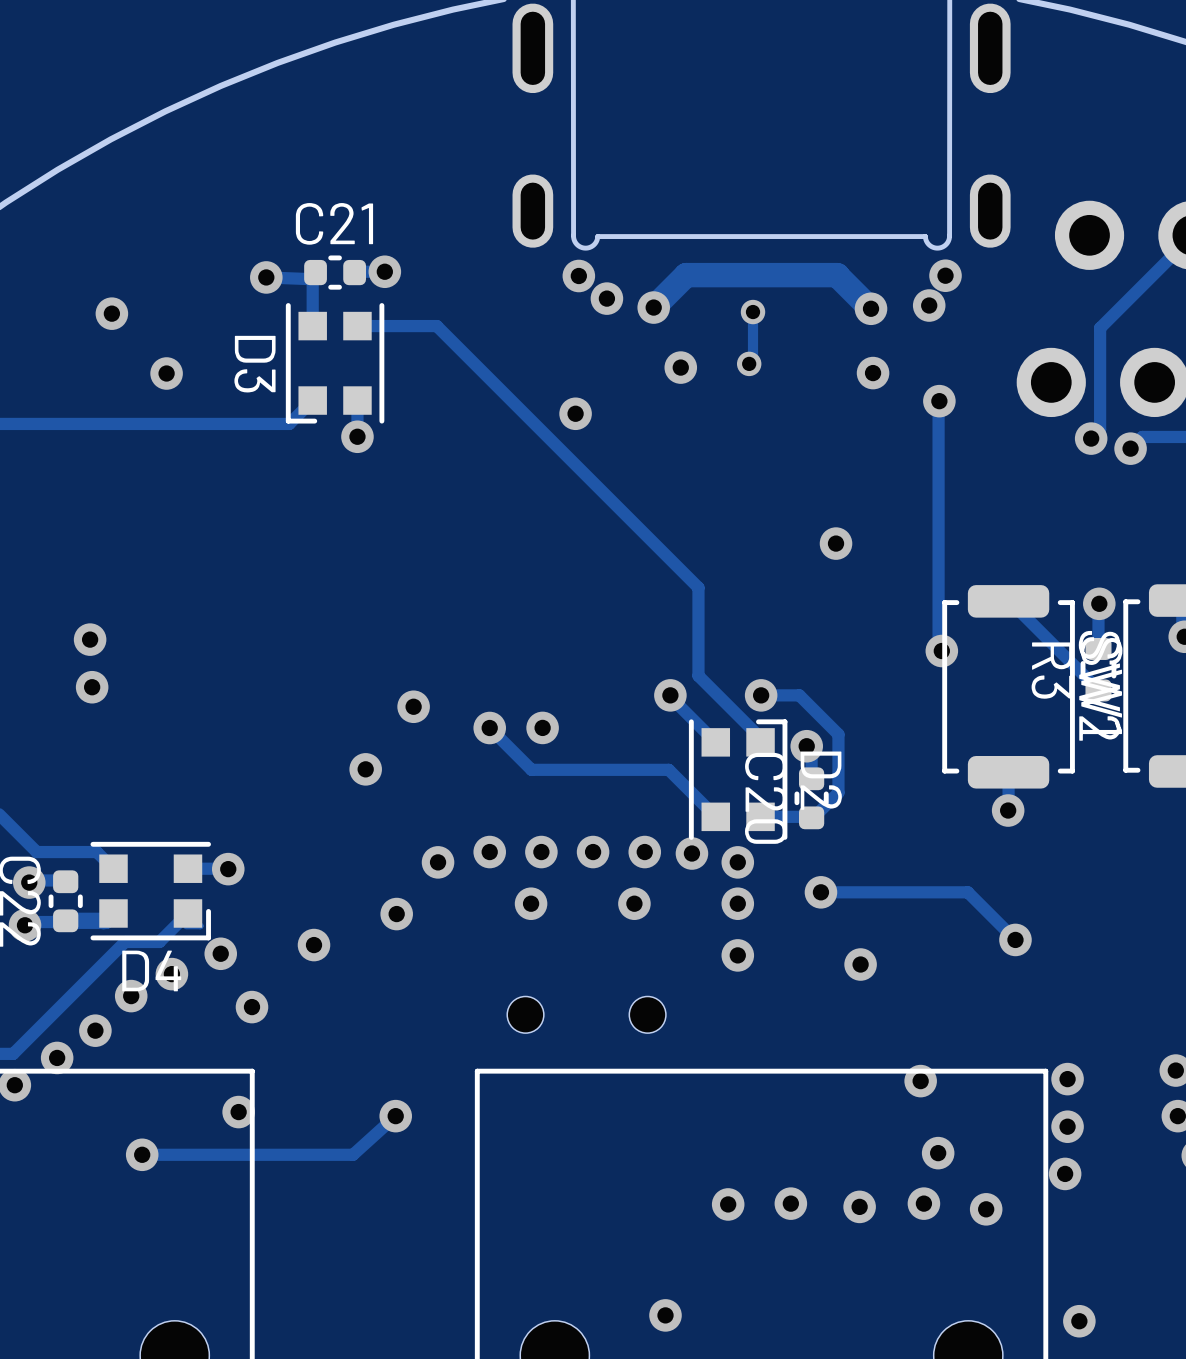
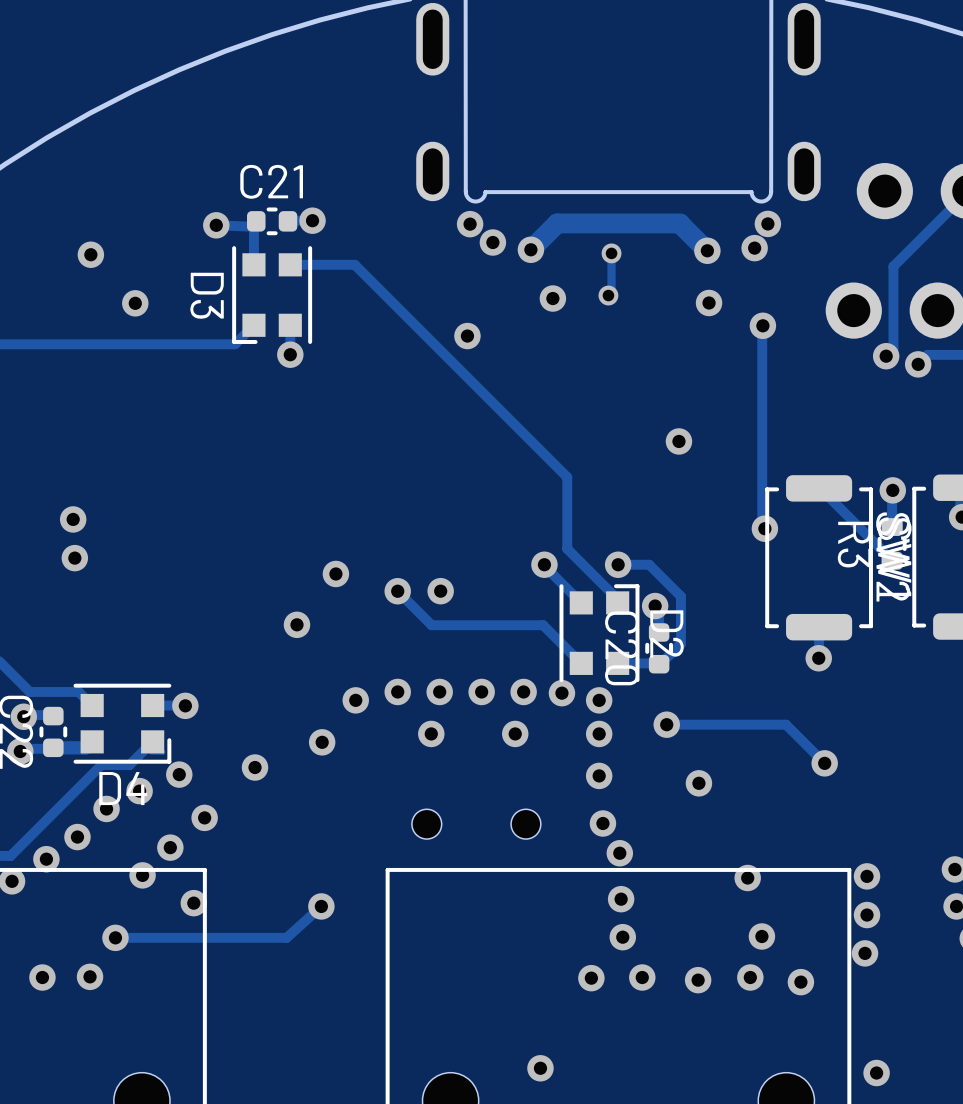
via: none -> (602, 823)
via: none -> (170, 847)
via: none -> (619, 853)
via: none -> (142, 875)
via: none -> (621, 899)
via: none -> (622, 937)
via: none -> (90, 976)
via: none -> (42, 977)

